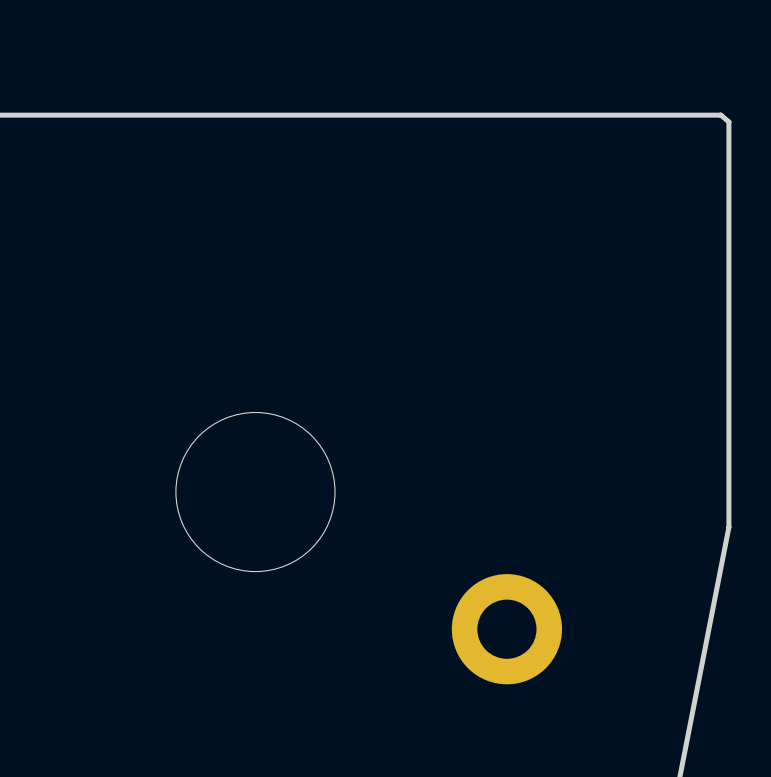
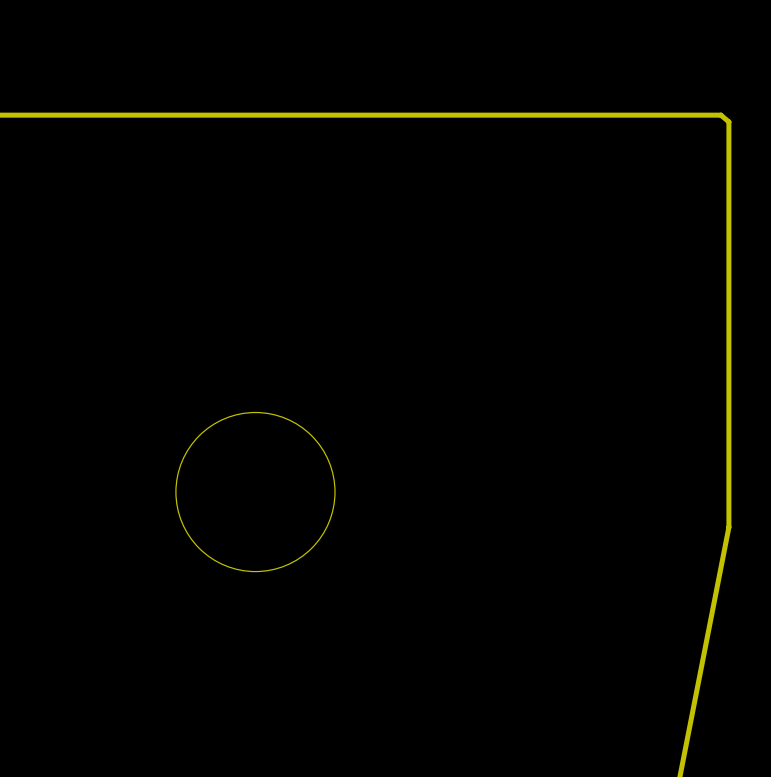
part: (506, 629) -> none

